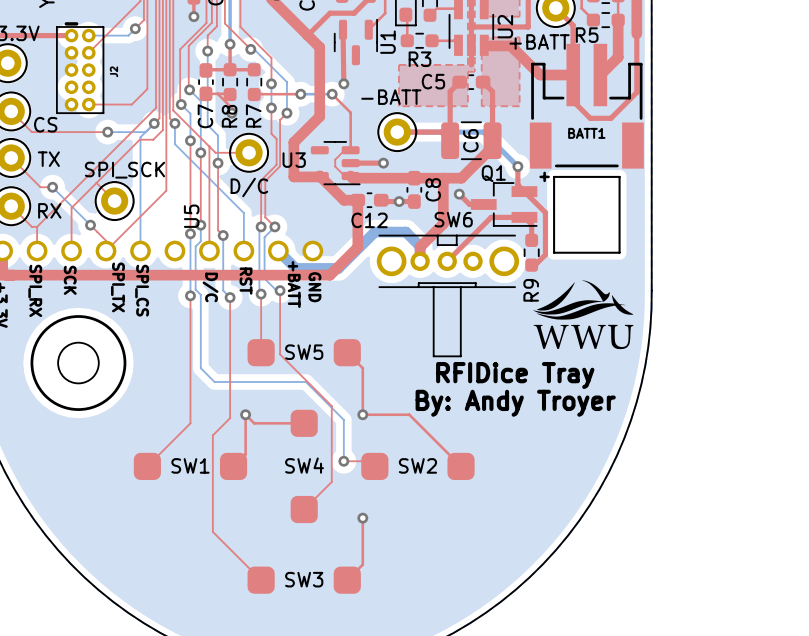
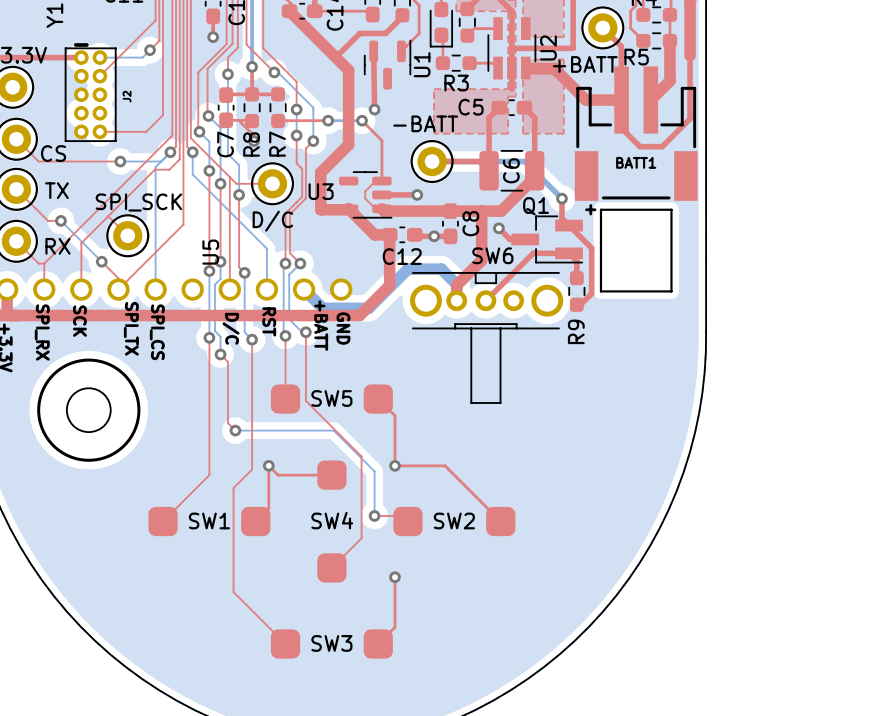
drawing: [533, 280, 634, 350] -> none
top track: none -> (220, 354) (227, 361) (227, 423) (235, 430)
bottom track: (200, 311) (200, 368) (214, 381) -> none
via: none -> (220, 354)
text: RFIDice Tray (515, 375) -> none
via: none -> (235, 430)
text: By: Andy Troyer (515, 403) -> none

